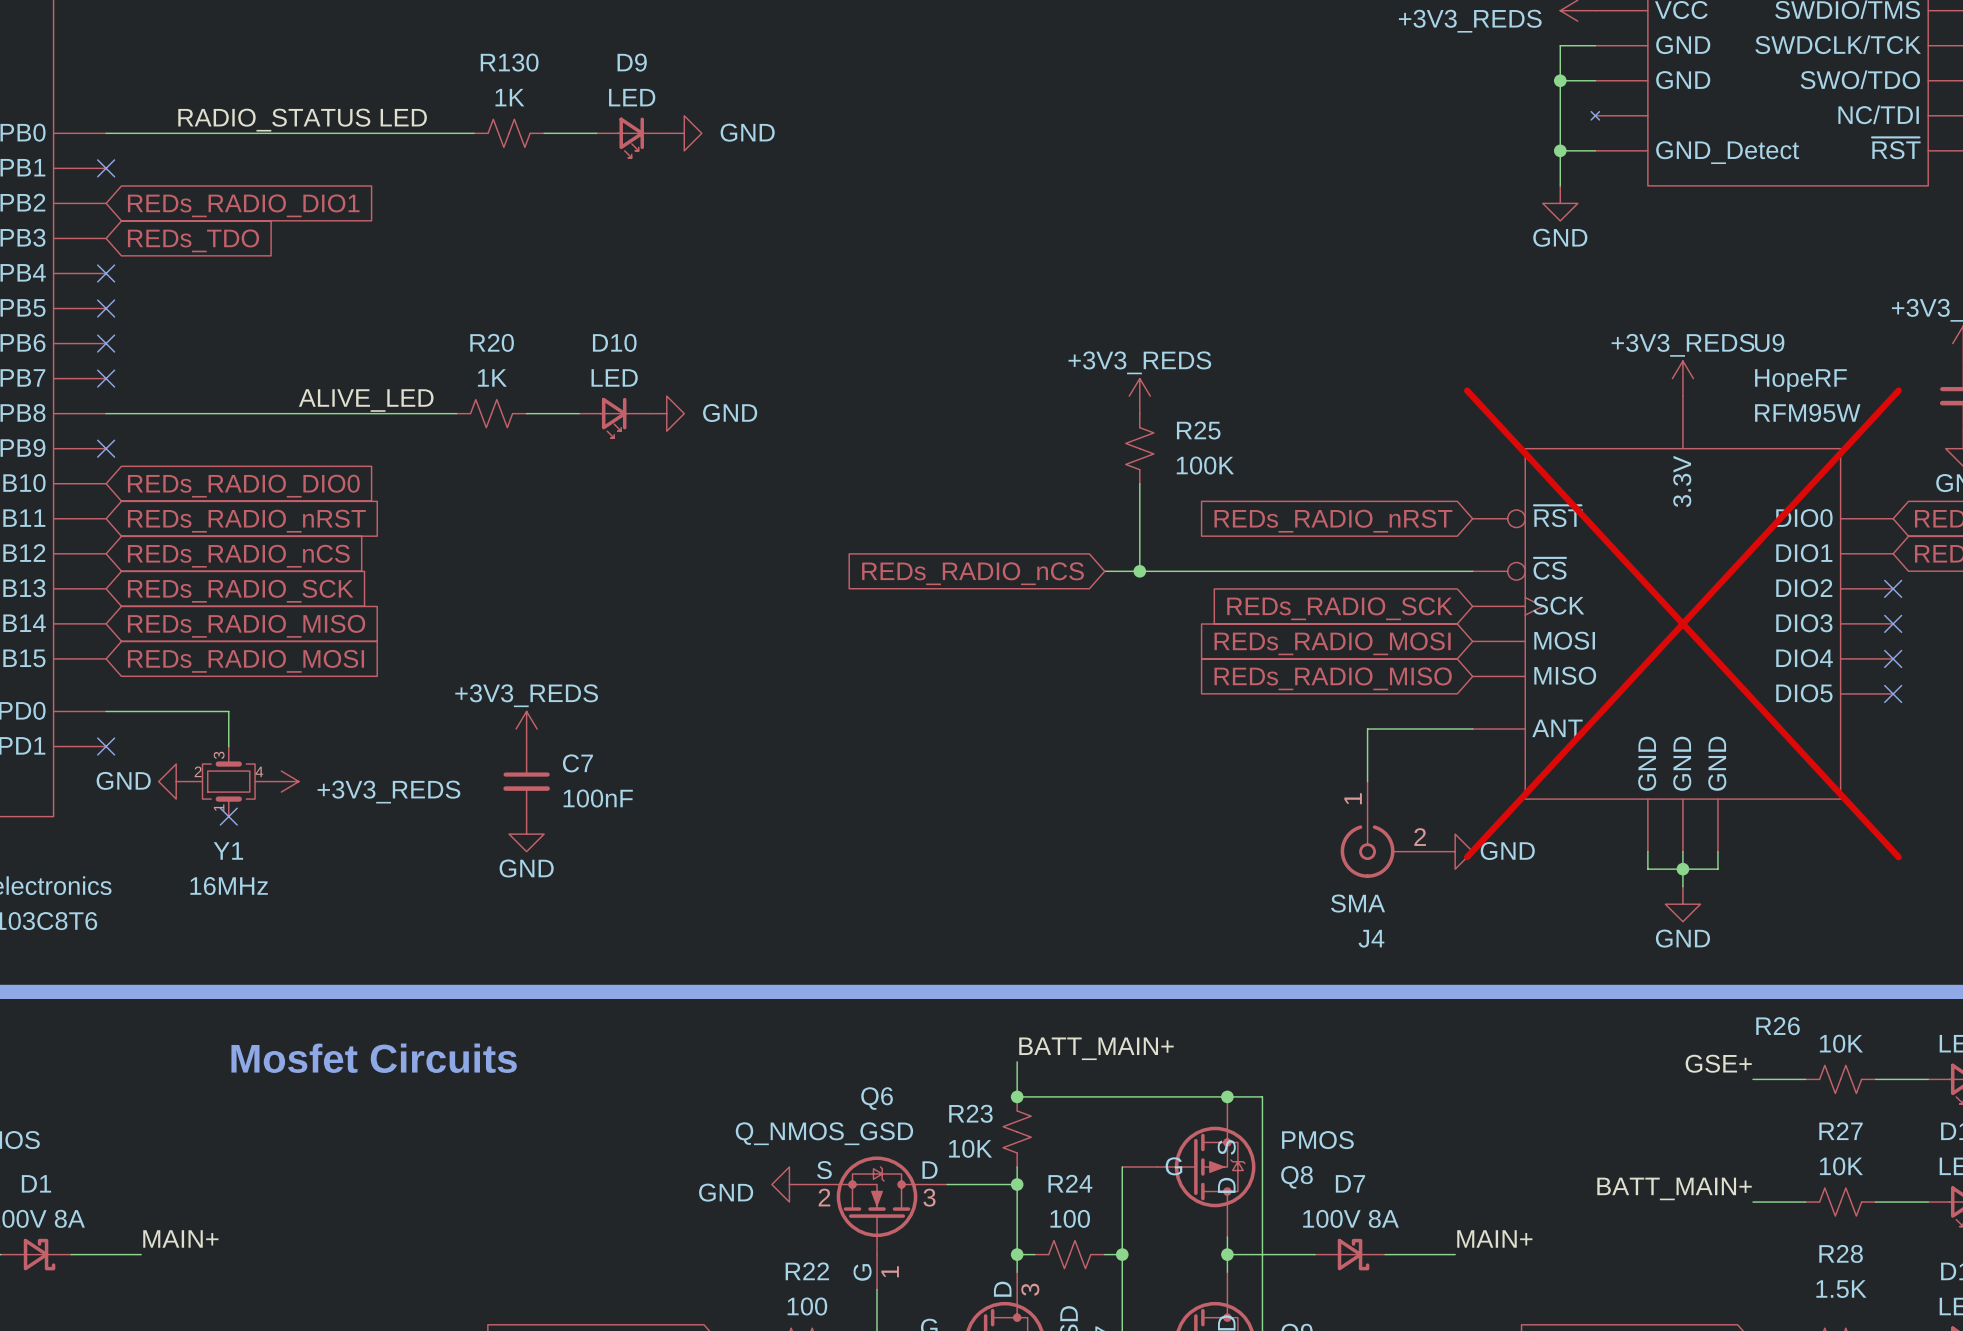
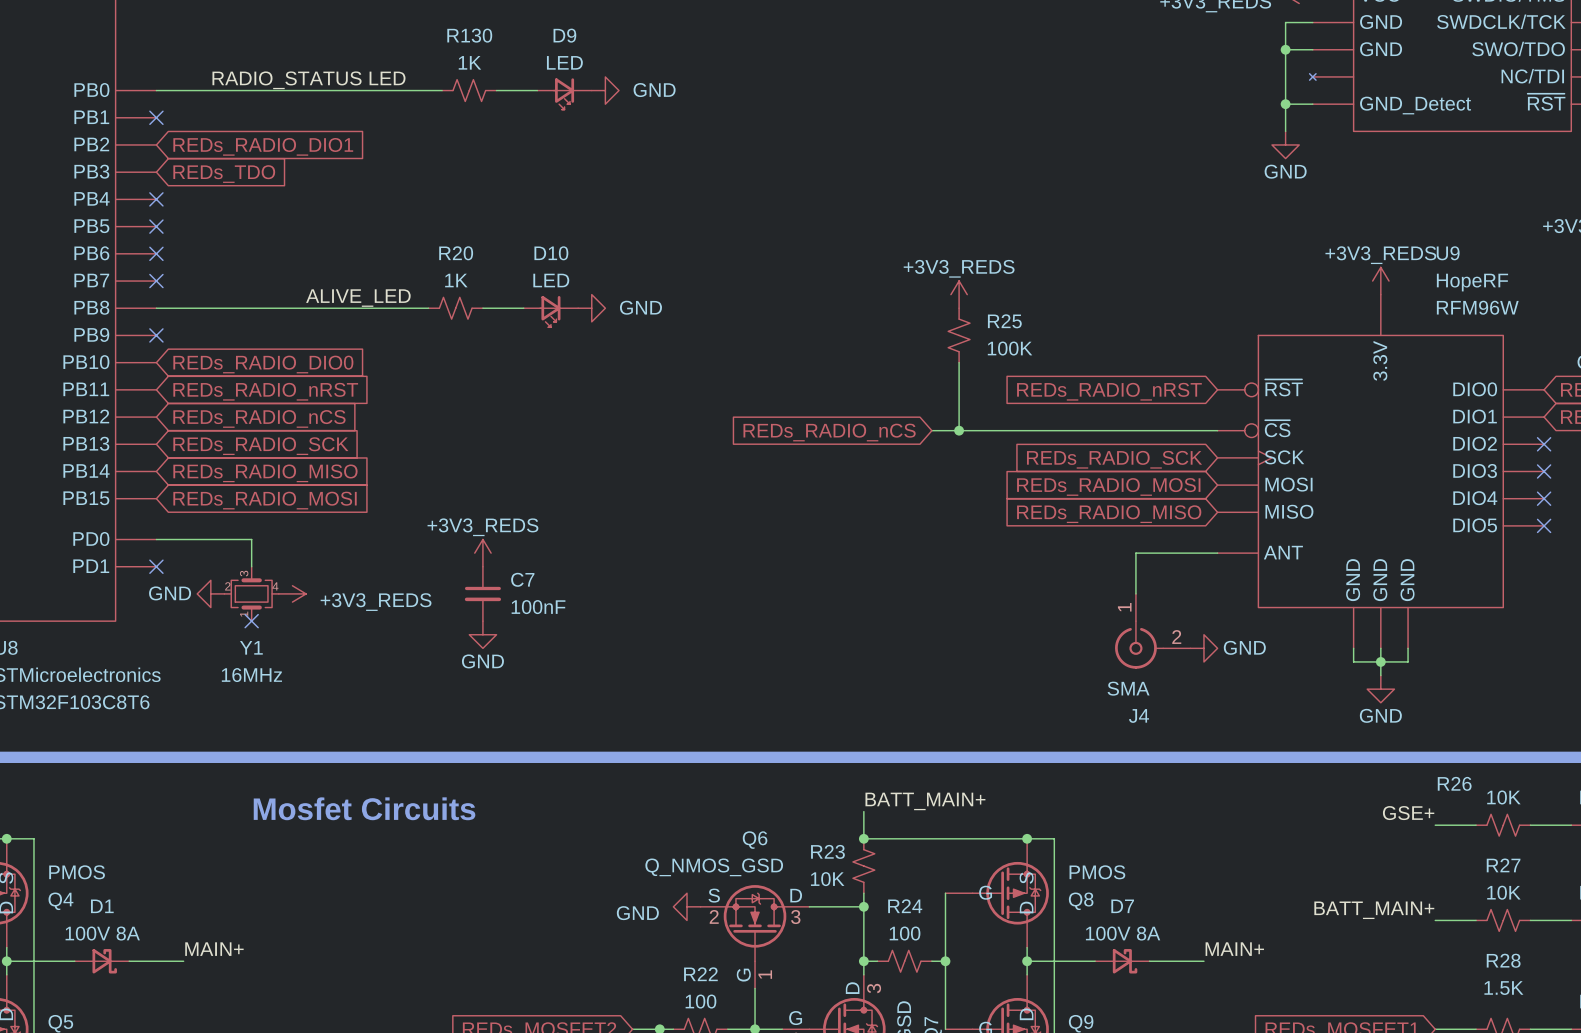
U9 text: RFM95W (1807, 412) -> RFM96W (1477, 307)
U9 do-not-place cross: (1682, 623) -> none

